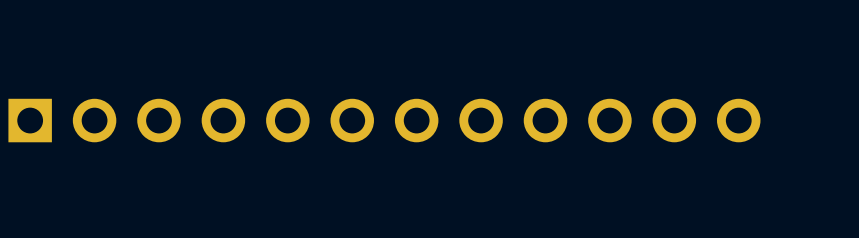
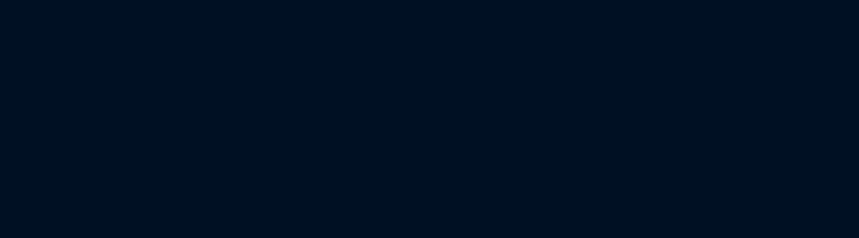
part: (384, 120) -> none

